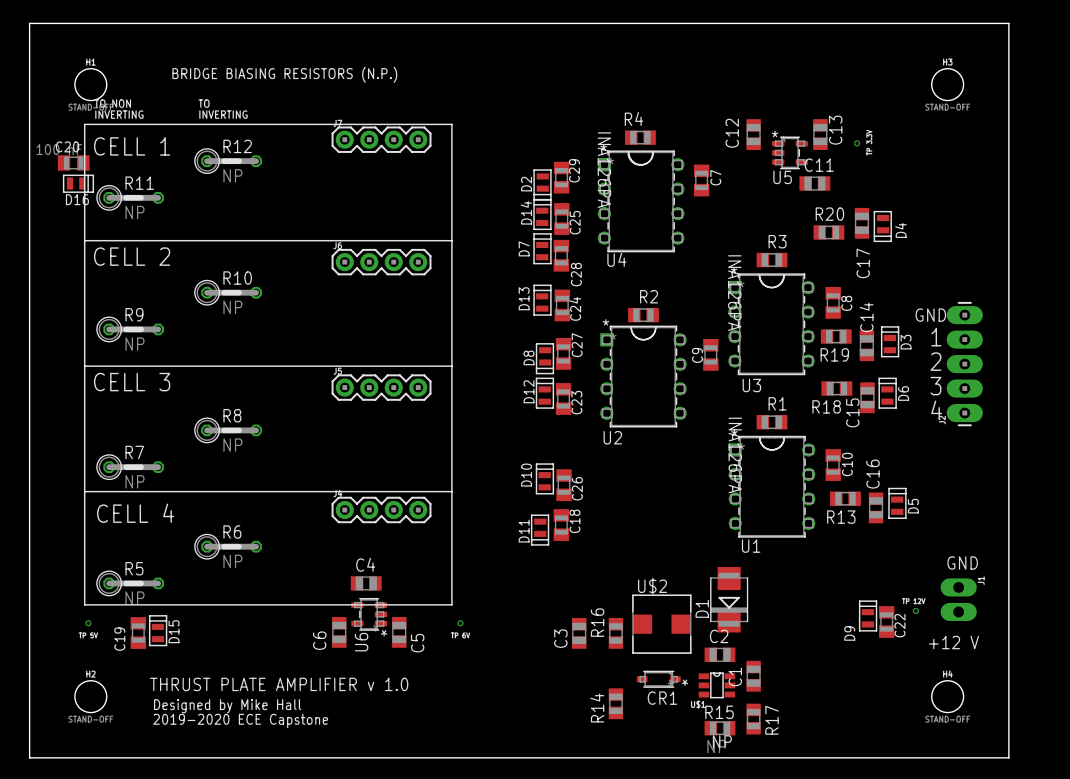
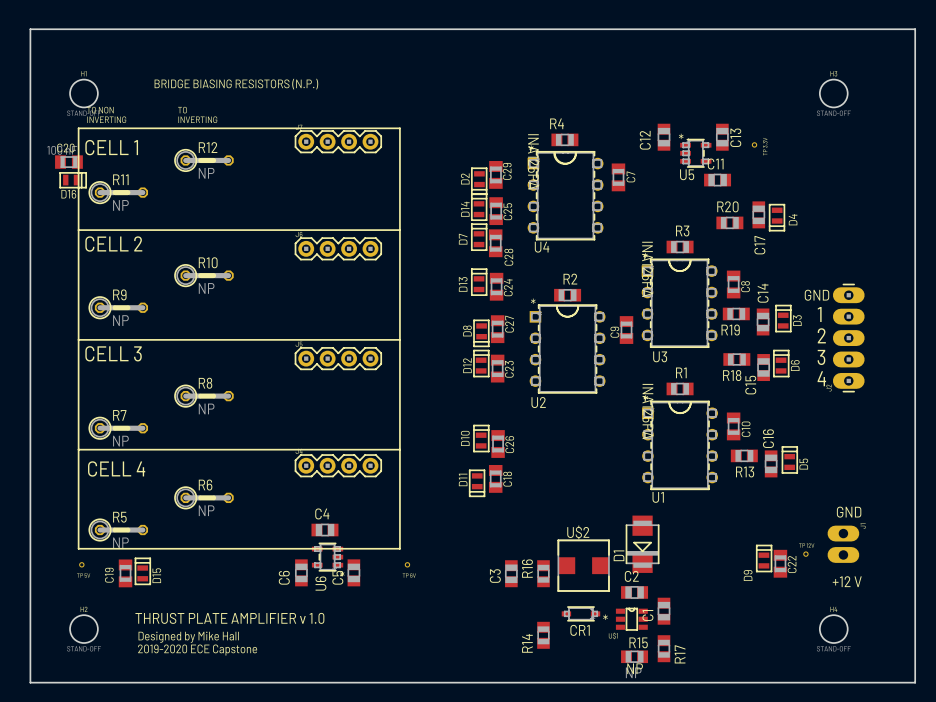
board edge: (29, 23) (1008, 23) (1008, 757) -> (30, 39) (30, 29) (915, 29) (915, 682) (887, 682)
C5 name position: C5 (417, 643) -> C5 (337, 577)

